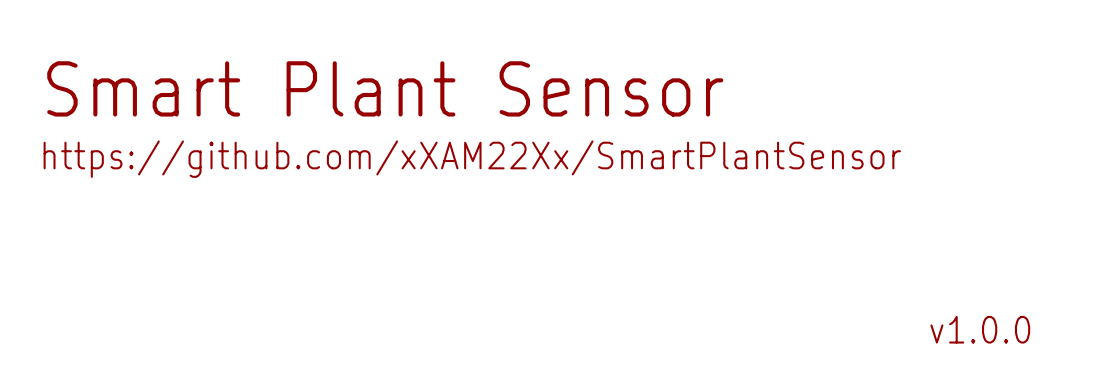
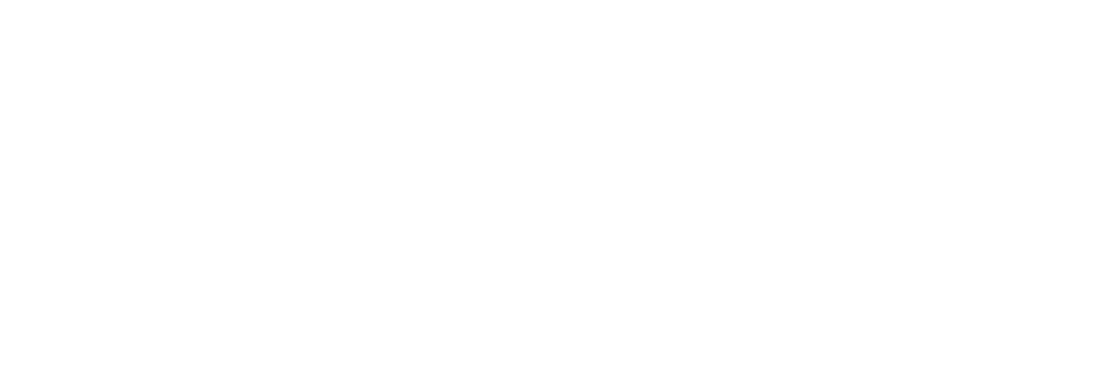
text: Smart Plant Sensor (385, 88) -> none
text: https://github.com/xXAM22Xx/SmartPlantSensor (472, 159) -> none
text: v1.0.0 (980, 329) -> none

